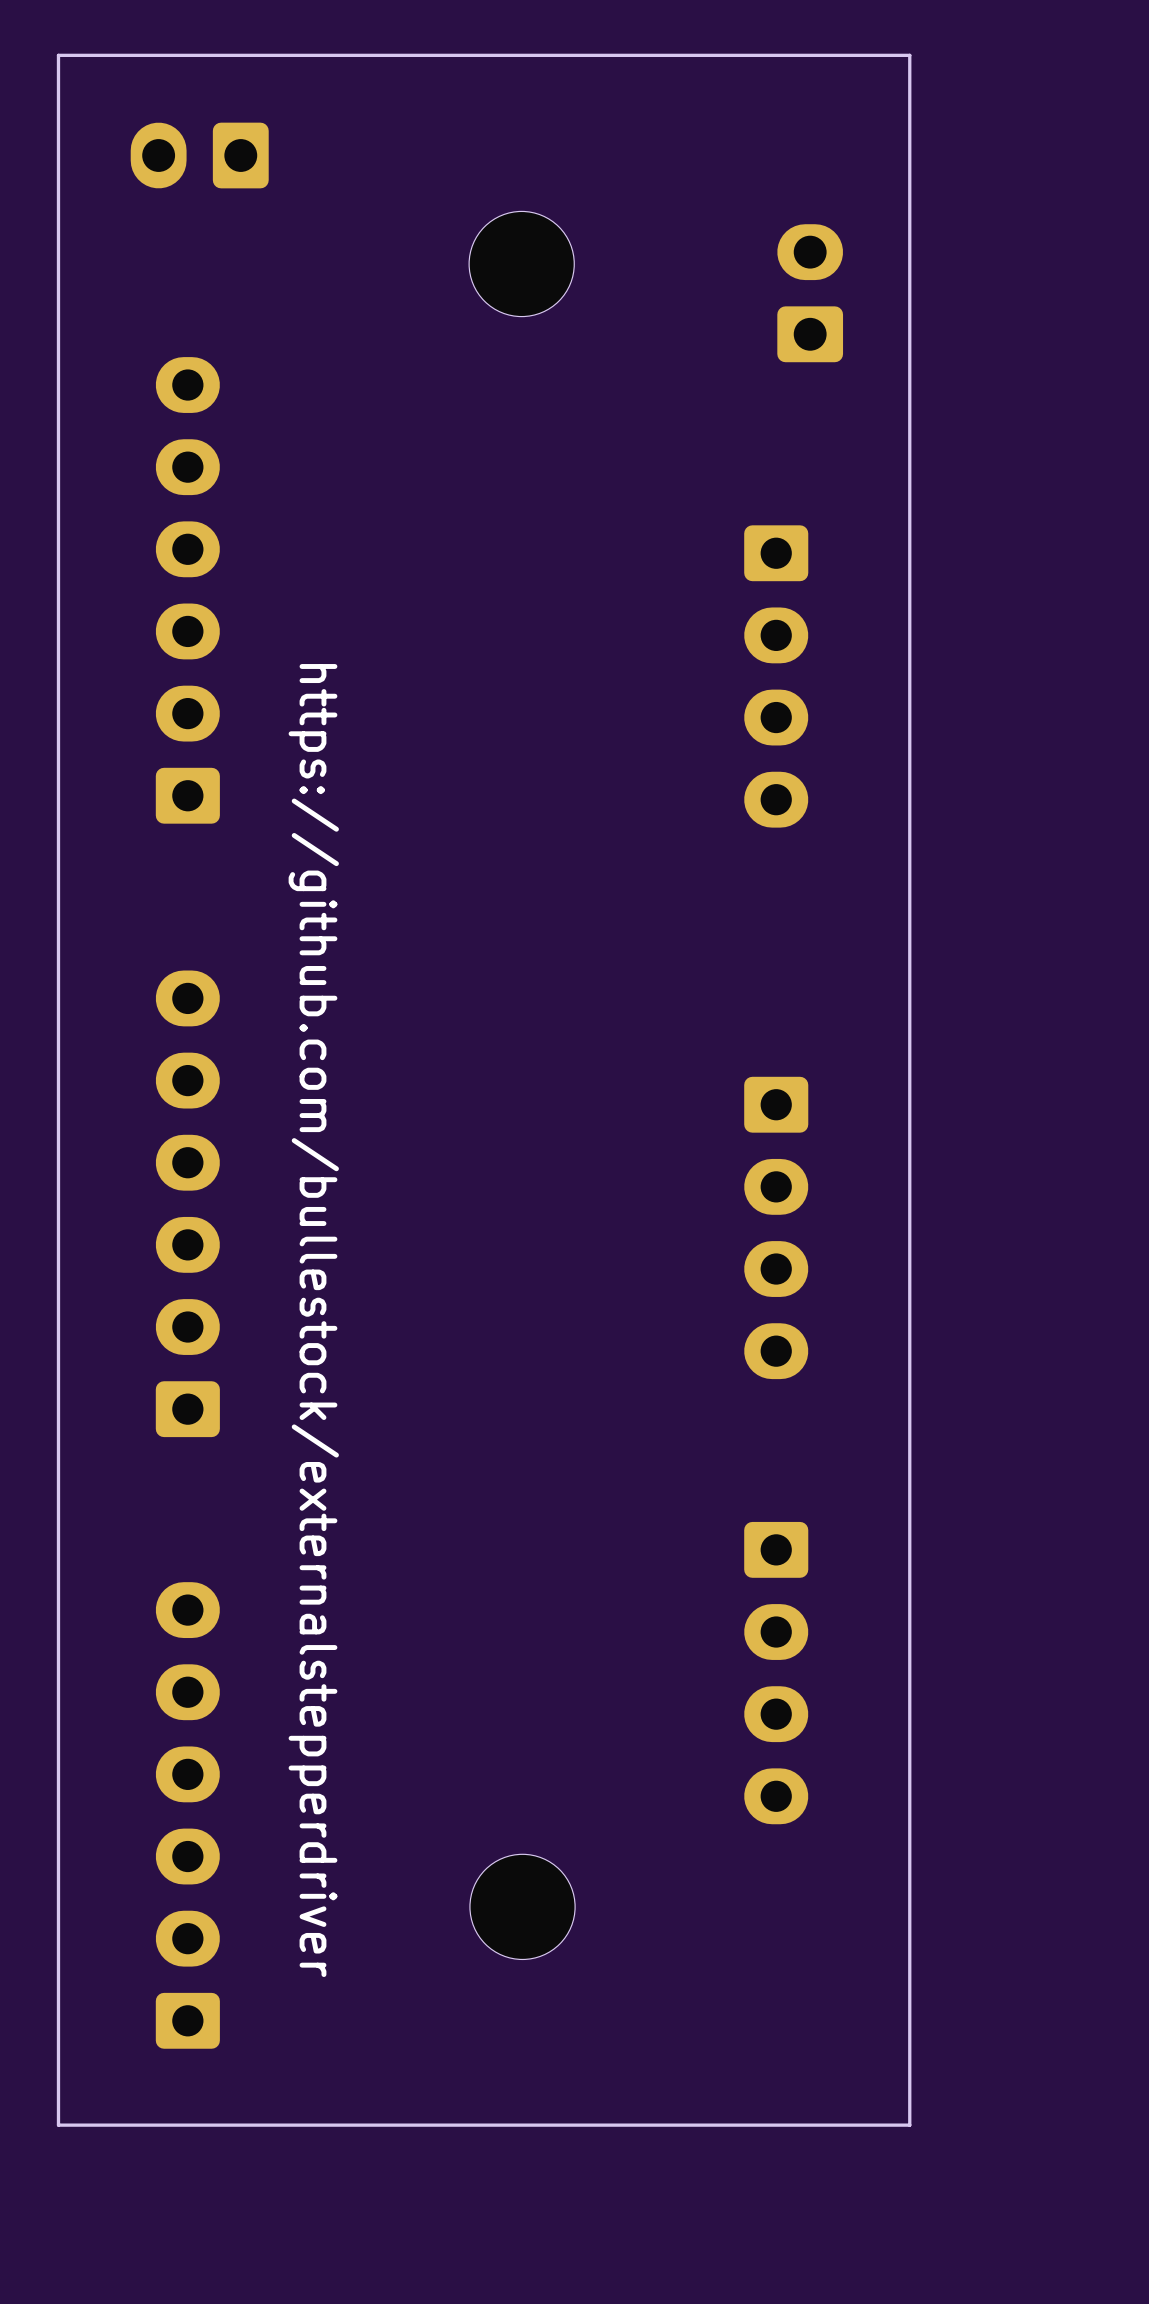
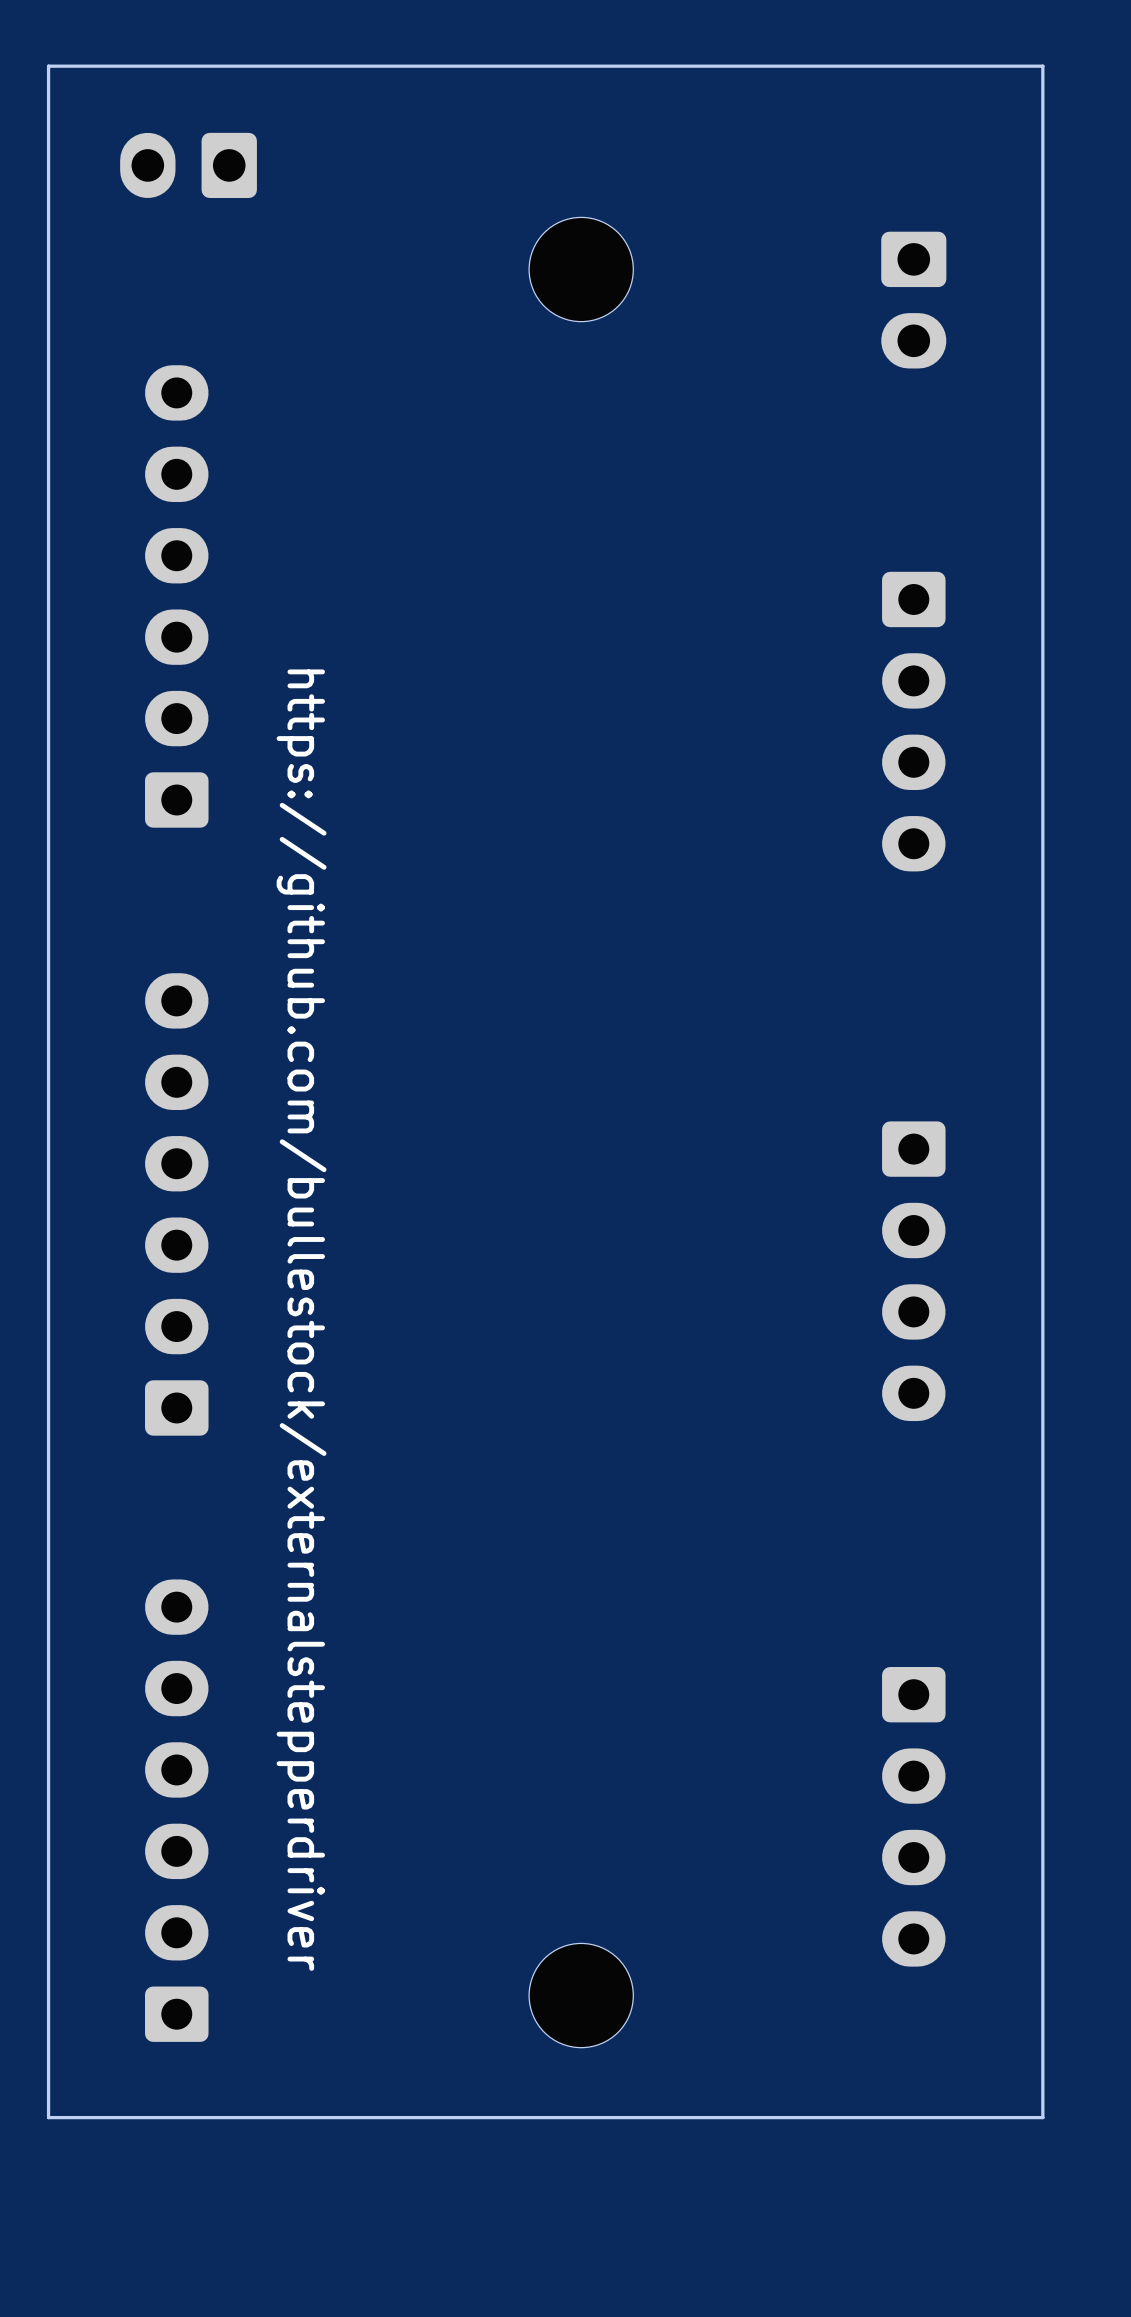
board edge: (909, 55) (909, 2125) -> (892, 66) (1042, 66) (1042, 2117) (892, 2117)
part position: (521, 264) -> (581, 269)
part rotation: 0° (810, 293) -> 180° (913, 300)
part position: (810, 293) -> (913, 300)
part position: (776, 676) -> (913, 721)
part position: (776, 1227) -> (913, 1271)
part position: (776, 1673) -> (913, 1816)
part position: (522, 1906) -> (581, 1995)

